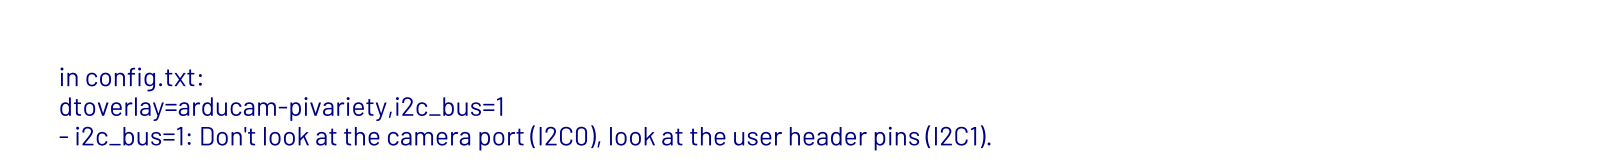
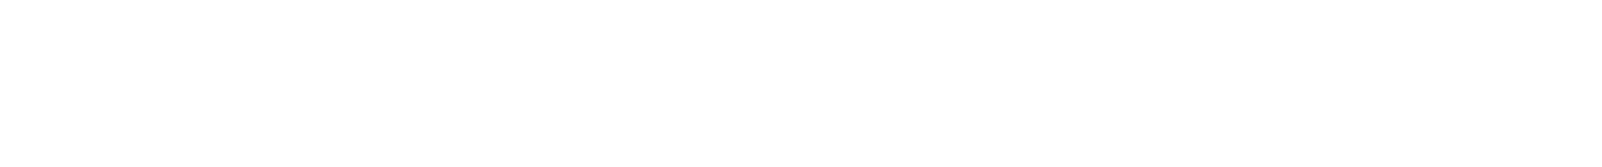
text: in config.txt: (131, 79) -> none
text: dtoverlay=arducam-pivariety,i2c_bus=1 (281, 109) -> none
text: - i2c_bus=1: Don't look at the camera port (I2C0), look at the user header pins (I2C1). (525, 137) -> none

